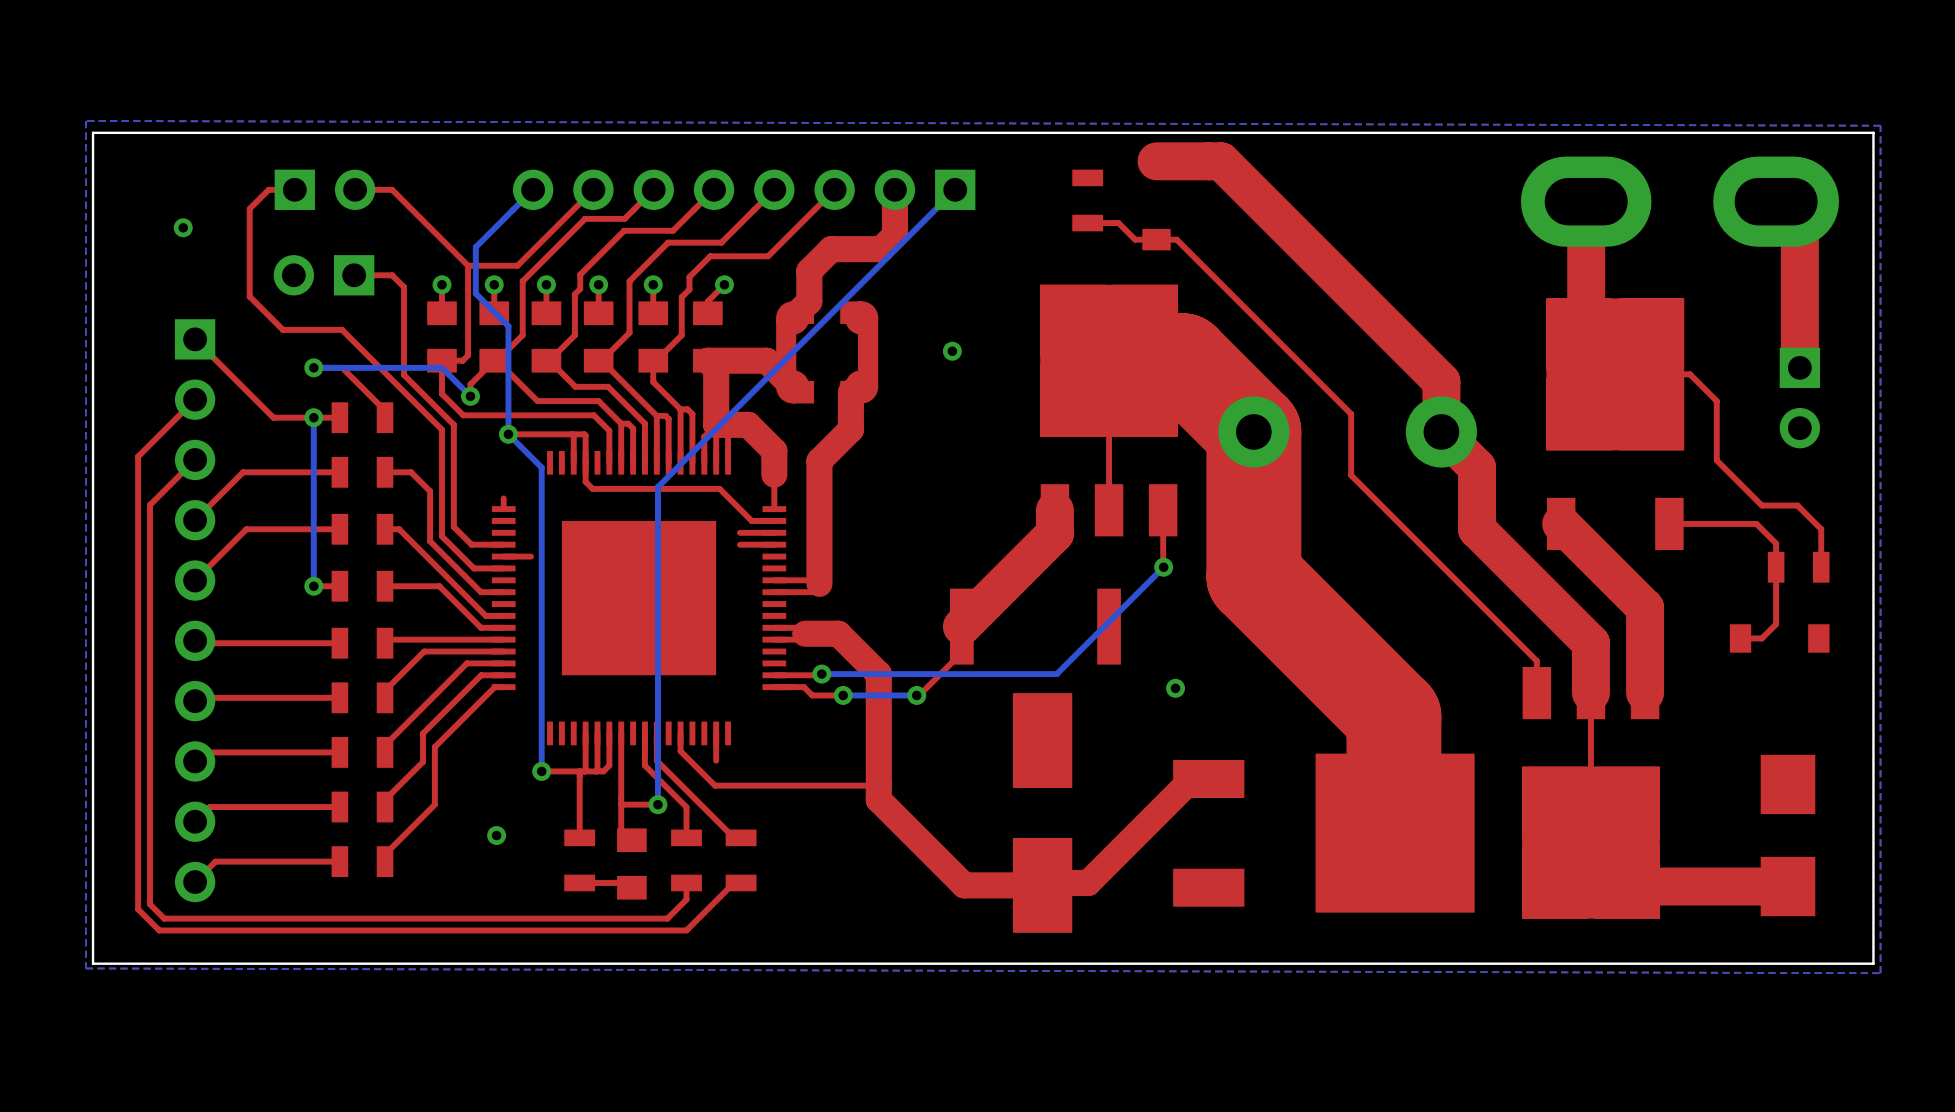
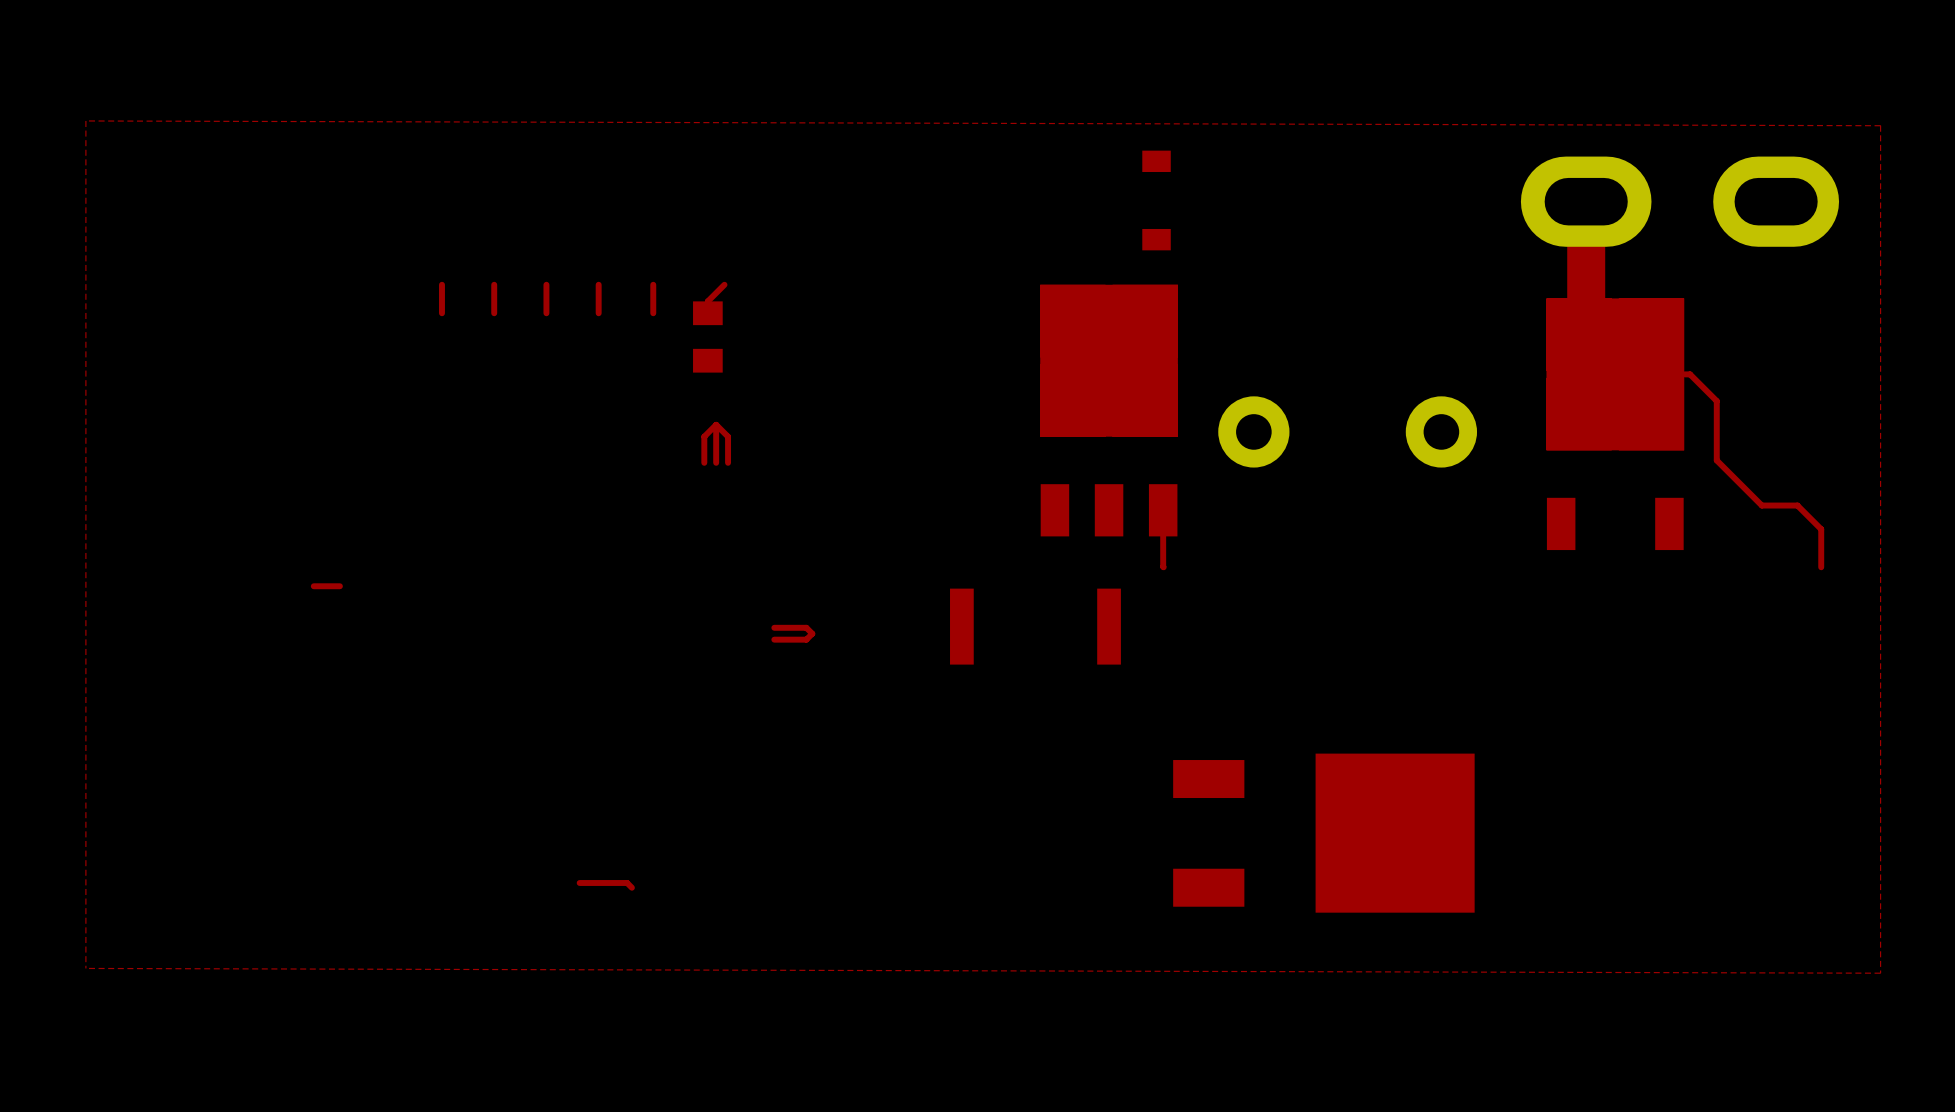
bottom zone outline: (85, 120) (1880, 125) (1880, 973) (85, 968) (85, 120) -> none
board edge: (1873, 132) (1873, 963) (93, 963) (93, 132) (1873, 132) -> none
top track: (1156, 161) (1221, 161) (1441, 381) (1441, 431) (1477, 467) (1477, 529) (1590, 643) (1590, 842) (1634, 886) (1787, 886) -> none
top track: (294, 189) (268, 189) (249, 208) (249, 296) (282, 329) (342, 329) (441, 429) (441, 536) (474, 568) (503, 568) -> none
part: (324, 189) -> none
top track: (355, 189) (392, 189) (468, 265) -> none
top track: (593, 189) (517, 265) (468, 265) -> none
top track: (653, 189) (624, 218) (585, 218) (522, 281) (522, 335) (497, 360) -> none
top track: (714, 189) (673, 230) (624, 230) (580, 274) (580, 288) (574, 294) (574, 335) (549, 360) -> none
part: (744, 189) -> none
top track: (774, 189) (721, 242) (668, 242) (629, 281) (629, 332) (601, 360) -> none
top track: (834, 189) (768, 256) (710, 256) (689, 277) (689, 289) (681, 297) (681, 335) (656, 360) (653, 360) (653, 382) (680, 409) -> none
top track: (894, 189) (894, 235) (881, 249) (831, 249) (809, 271) (809, 301) (792, 318) -> none
bottom track: (955, 189) (657, 487) (657, 804) -> none
bottom track: (541, 198) (533, 189) (475, 247) (475, 293) (508, 326) (508, 434) (541, 467) (541, 771) -> none
part: (1087, 200) -> none
top track: (1776, 201) (1799, 225) (1799, 367) -> none
top track: (1087, 223) (1118, 223) (1135, 239) (1176, 239) (1351, 414) (1351, 475) (1536, 661) (1536, 693) -> none
via: (183, 227) -> none
top track: (468, 265) (468, 355) (462, 360) (441, 360) (441, 393) (463, 415) (593, 415) (609, 430) (609, 462) -> none
part: (324, 275) -> none
top track: (354, 275) (392, 275) (404, 287) (404, 374) (453, 424) (453, 526) (471, 544) (503, 544) -> none
via: (441, 284) -> none
via: (494, 284) -> none
via: (546, 284) -> none
via: (598, 284) -> none
via: (653, 284) -> none
via: (724, 284) -> none
part: (441, 336) -> none
part: (494, 336) -> none
part: (546, 336) -> none
part: (598, 336) -> none
part: (653, 336) -> none
top track: (195, 339) (273, 417) (339, 417) -> none
via: (952, 351) -> none
part: (827, 352) -> none
top track: (497, 360) (494, 360) (470, 384) (470, 396) -> none
top track: (497, 360) (537, 401) (598, 401) (621, 423) -> none
top track: (549, 360) (575, 386) (608, 386) (644, 423) (644, 462) -> none
top track: (601, 360) (656, 415) -> none
top track: (313, 367) (342, 367) (385, 410) (385, 417) -> none
bottom track: (313, 367) (441, 367) (470, 396) -> none
via: (313, 367) -> none
top track: (792, 386) (766, 360) (707, 360) (716, 369) (716, 424) (748, 424) (774, 450) (774, 509) -> none
top track: (850, 392) (850, 429) (819, 461) (819, 583) -> none
via: (470, 396) -> none
part: (1799, 398) -> none
top track: (195, 399) (138, 456) (138, 909) (159, 930) (686, 930) (733, 882) (741, 882) -> none
top track: (680, 409) (680, 462) -> none
top track: (680, 409) (687, 409) (692, 414) (692, 462) -> none
top track: (656, 415) (656, 462) -> none
top track: (656, 415) (665, 415) (668, 418) (668, 462) -> none
bottom track: (313, 417) (313, 586) -> none
via: (313, 417) -> none
part: (362, 417) -> none
top track: (621, 423) (621, 462) -> none
top track: (621, 423) (628, 423) (633, 428) (633, 462) -> none
top track: (508, 434) (584, 434) (585, 481) (592, 488) (719, 488) (751, 520) (774, 520) -> none
via: (508, 434) -> none
top track: (572, 434) (573, 462) -> none
top track: (195, 459) (150, 505) (150, 904) (164, 918) (667, 918) (686, 899) (686, 882) -> none
top track: (339, 472) (243, 472) (195, 520) -> none
part: (362, 472) -> none
top track: (385, 472) (411, 472) (430, 491) (430, 541) (480, 592) (503, 592) -> none
top track: (503, 498) (503, 509) -> none
top track: (1054, 510) (1054, 533) (961, 626) (961, 652) (919, 695) (916, 695) -> none
top track: (1109, 510) (1109, 360) (1182, 360) (1253, 431) (1253, 576) (1393, 716) (1395, 833) -> none
top track: (1561, 523) (1645, 607) (1645, 693) -> none
top track: (1669, 523) (1756, 523) (1776, 543) (1776, 624) (1761, 638) (1740, 638) -> none
top track: (339, 529) (246, 529) (195, 580) -> none
part: (362, 529) -> none
top track: (385, 529) (399, 529) (485, 615) (503, 615) -> none
top track: (774, 532) (739, 532) -> none
top track: (774, 544) (739, 544) -> none
top track: (531, 556) (503, 556) -> none
bottom track: (1163, 567) (1056, 674) (821, 674) -> none
via: (1163, 567) -> none
part: (1798, 567) -> none
top track: (774, 580) (815, 580) (819, 583) -> none
top track: (819, 583) (811, 592) (774, 592) -> none
via: (313, 586) -> none
part: (362, 586) -> none
top track: (385, 586) (439, 586) (480, 627) (503, 627) -> none
part: (639, 598) -> none
part: (195, 610) -> none
top track: (805, 633) (838, 633) (878, 674) (878, 799) (964, 885) (1042, 885) (1044, 882) (1088, 882) (1192, 779) (1208, 779) -> none
part: (1779, 638) -> none
top track: (503, 639) (388, 639) (385, 643) -> none
top track: (195, 640) (197, 643) (339, 643) -> none
part: (362, 643) -> none
top track: (503, 651) (424, 651) (385, 690) (385, 697) -> none
top track: (503, 663) (466, 663) (385, 745) (385, 752) -> none
top track: (821, 674) (774, 675) -> none
via: (821, 674) -> none
top track: (503, 675) (481, 675) (423, 733) (423, 761) (385, 799) (385, 807) -> none
top track: (503, 687) (494, 687) (434, 747) (434, 804) (385, 854) (385, 861) -> none
top track: (774, 687) (804, 687) (812, 695) (843, 695) -> none
via: (1175, 688) -> none
via: (843, 695) -> none
bottom track: (916, 695) (843, 695) -> none
via: (916, 695) -> none
top track: (339, 697) (198, 697) (195, 701) -> none
part: (362, 697) -> none
top track: (585, 733) (584, 771) -> none
top track: (597, 733) (596, 771) -> none
top track: (609, 733) (609, 765) (603, 771) (541, 771) -> none
top track: (621, 733) (621, 829) (631, 840) -> none
top track: (644, 733) (644, 765) (686, 807) (686, 837) -> none
top track: (656, 733) (656, 760) (733, 837) (741, 837) -> none
top track: (680, 733) (680, 751) (714, 785) (878, 785) -> none
top track: (716, 733) (716, 760) -> none
top track: (339, 752) (204, 752) (195, 761) -> none
part: (362, 752) -> none
via: (541, 771) -> none
top track: (579, 771) (579, 837) -> none
part: (1590, 792) -> none
top track: (657, 804) (621, 804) -> none
via: (657, 804) -> none
top track: (339, 807) (209, 807) (195, 821) -> none
part: (362, 807) -> none
part: (1042, 812) -> none
via: (496, 835) -> none
part: (1787, 835) -> none
part: (579, 860) -> none
part: (686, 860) -> none
part: (741, 860) -> none
top track: (339, 861) (215, 861) (195, 882) -> none
part: (362, 861) -> none
part: (631, 864) -> none

